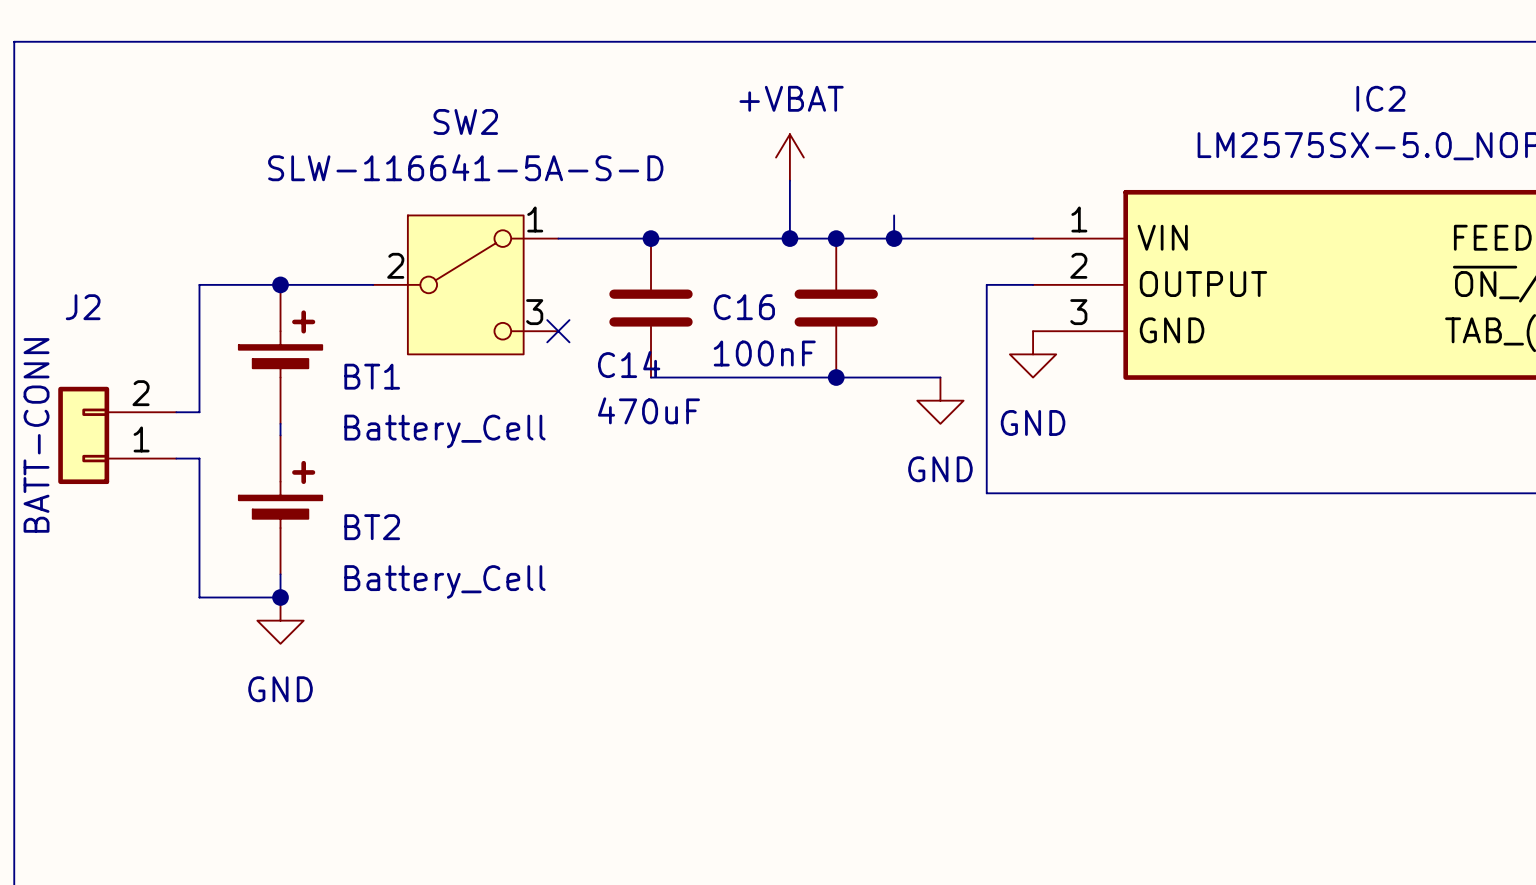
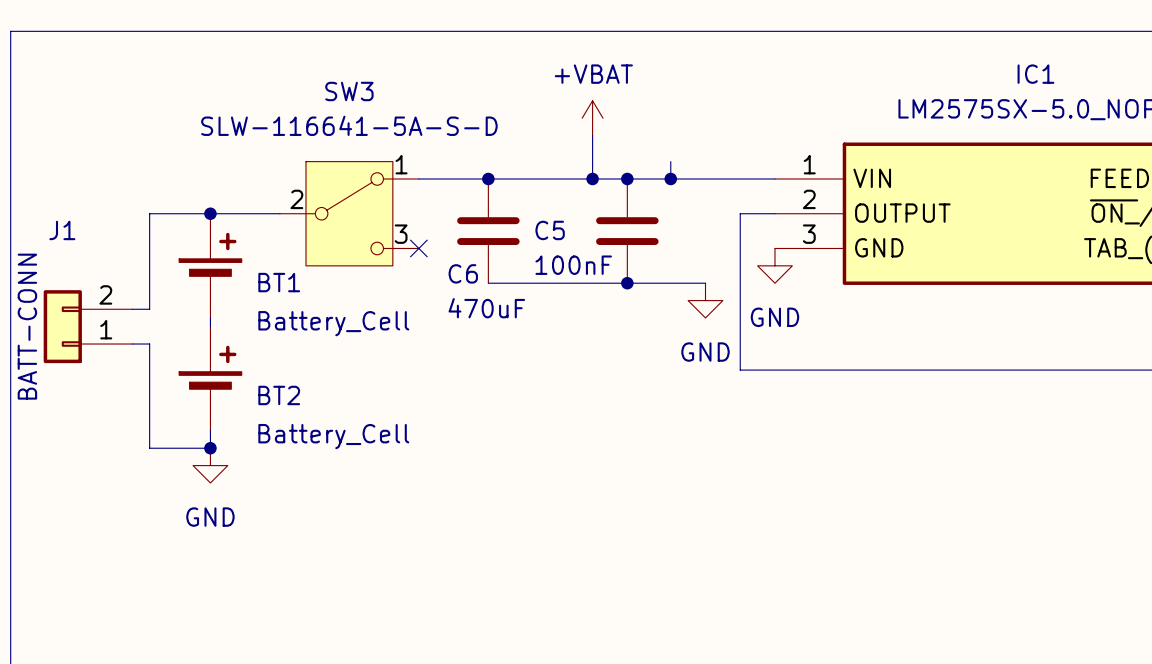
IC2 name: IC2 (1380, 98) -> IC1 (1035, 74)
SW2 name: SW2 (465, 121) -> SW3 (349, 91)
J2 name: J2 (83, 307) -> J1 (62, 230)
C16 name: C16 (744, 307) -> C5 (550, 230)
C14 name: C14 (629, 364) -> C6 (463, 273)

